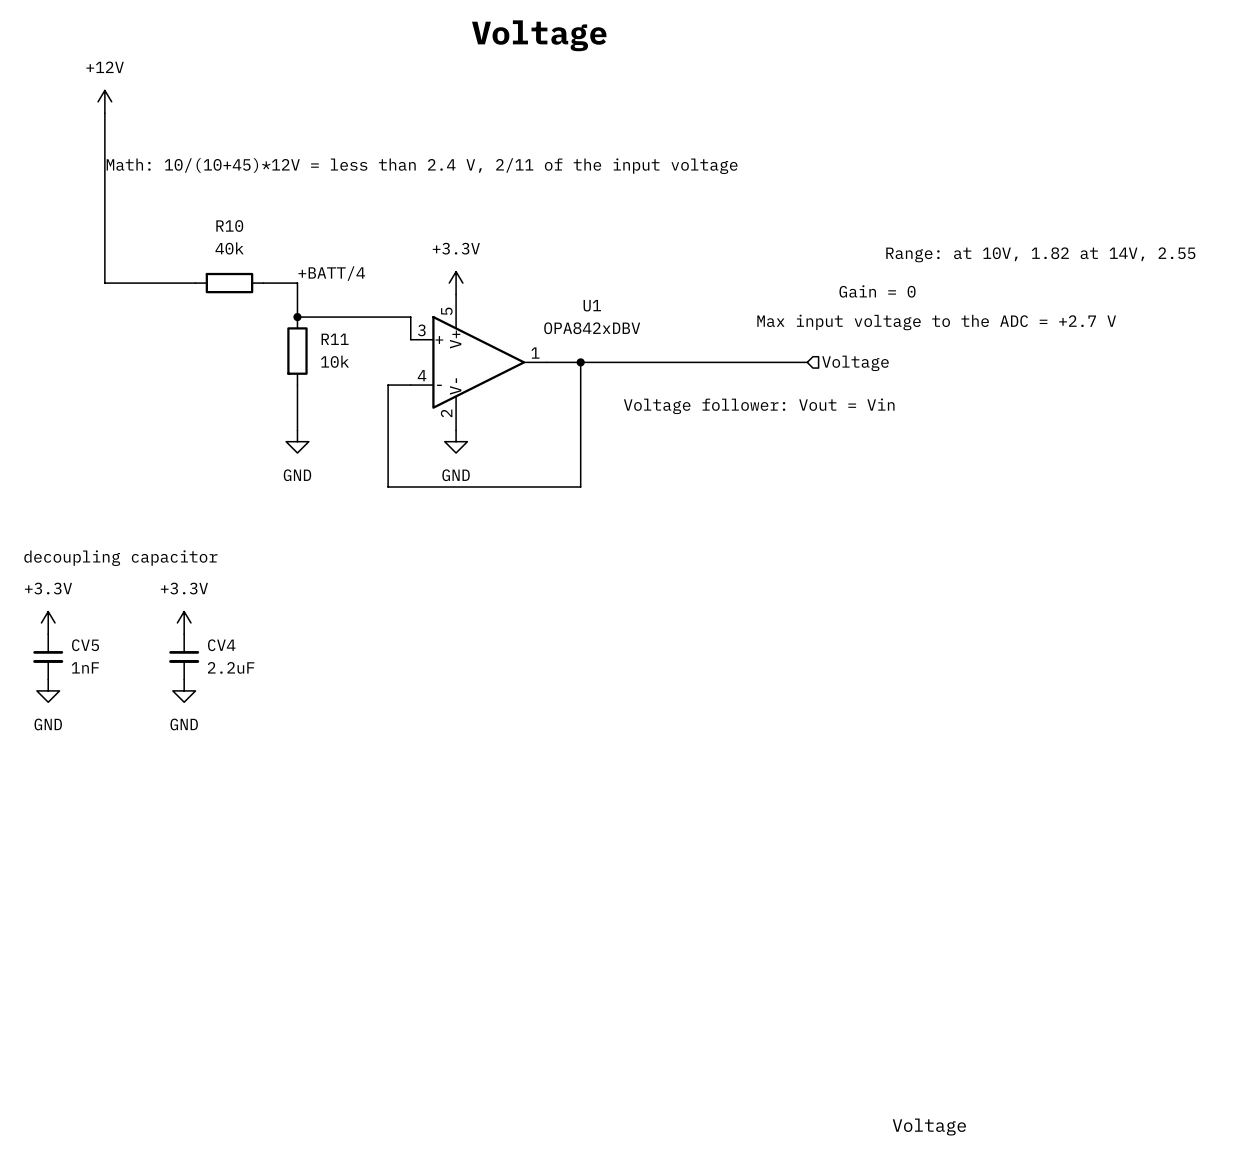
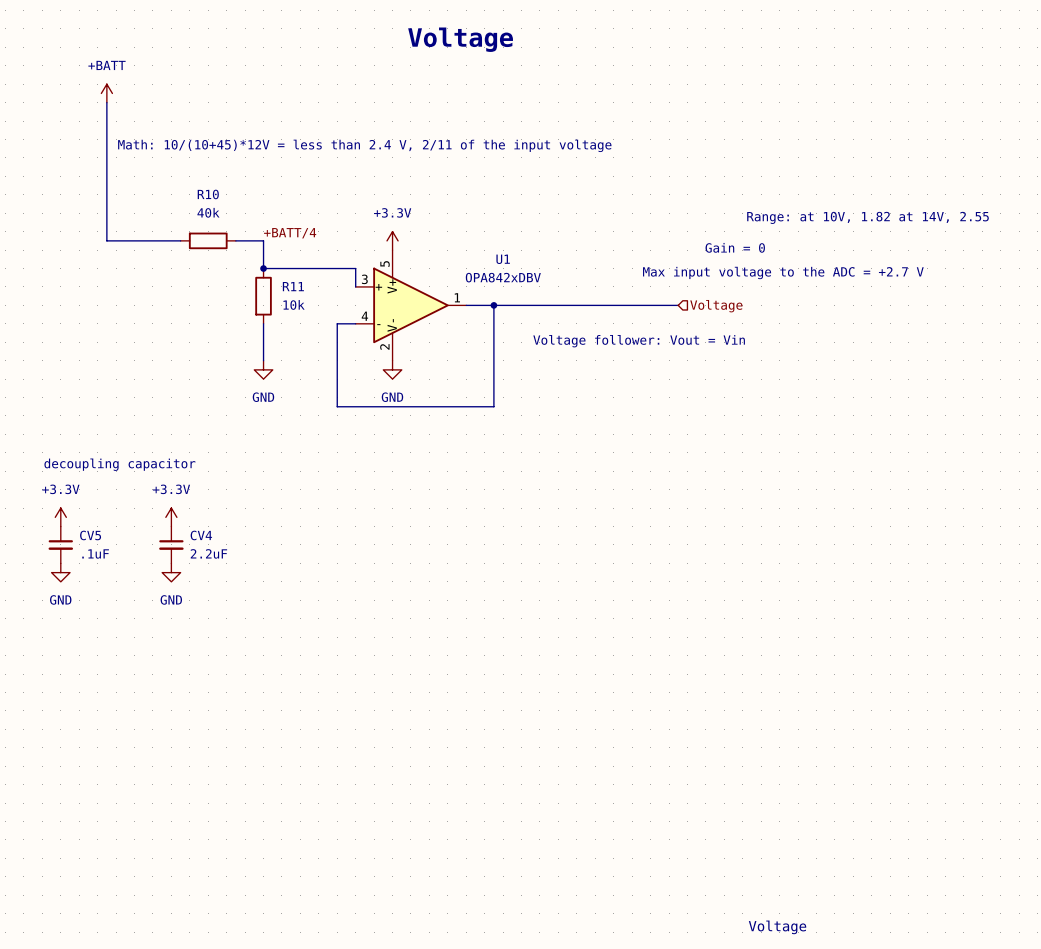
power symbol: +12V (104, 101) -> +BATT (106, 93)
CV5 value: 1nF (85, 667) -> .1uF (95, 553)

